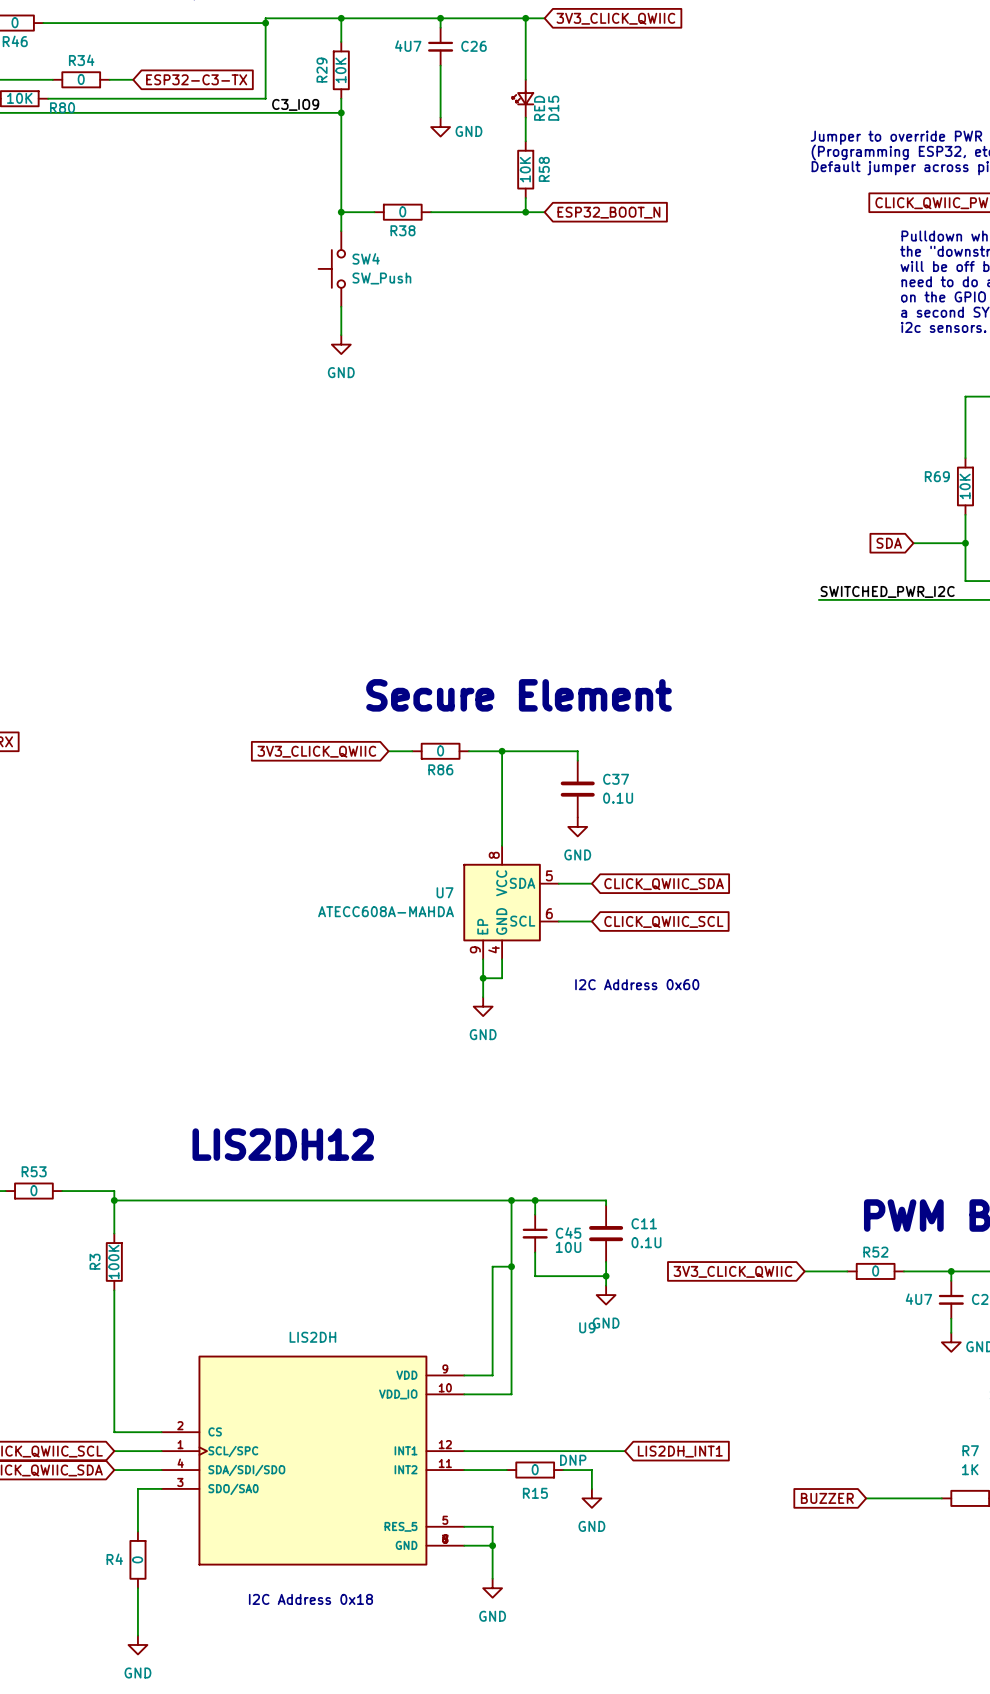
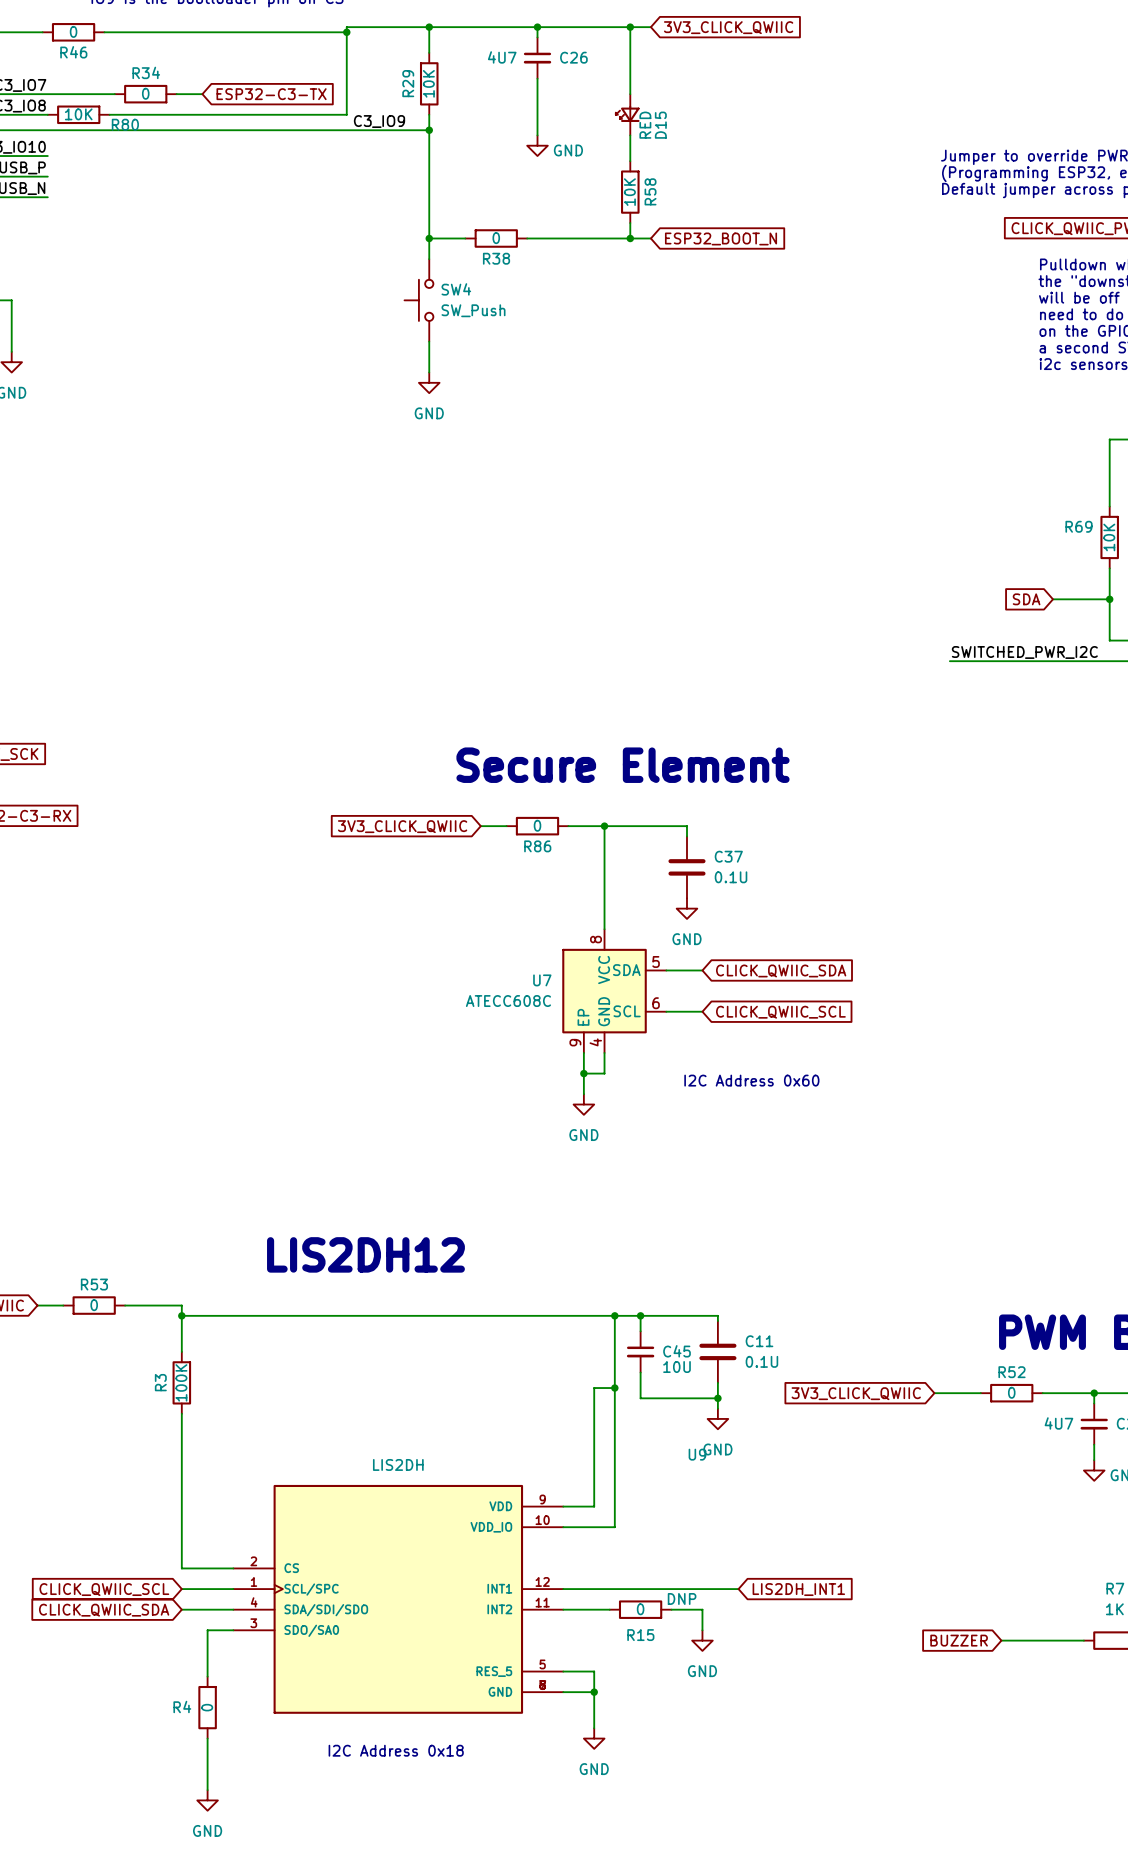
U7 value: ATECC608A-MAHDA (386, 911) -> ATECC608C (508, 1001)

